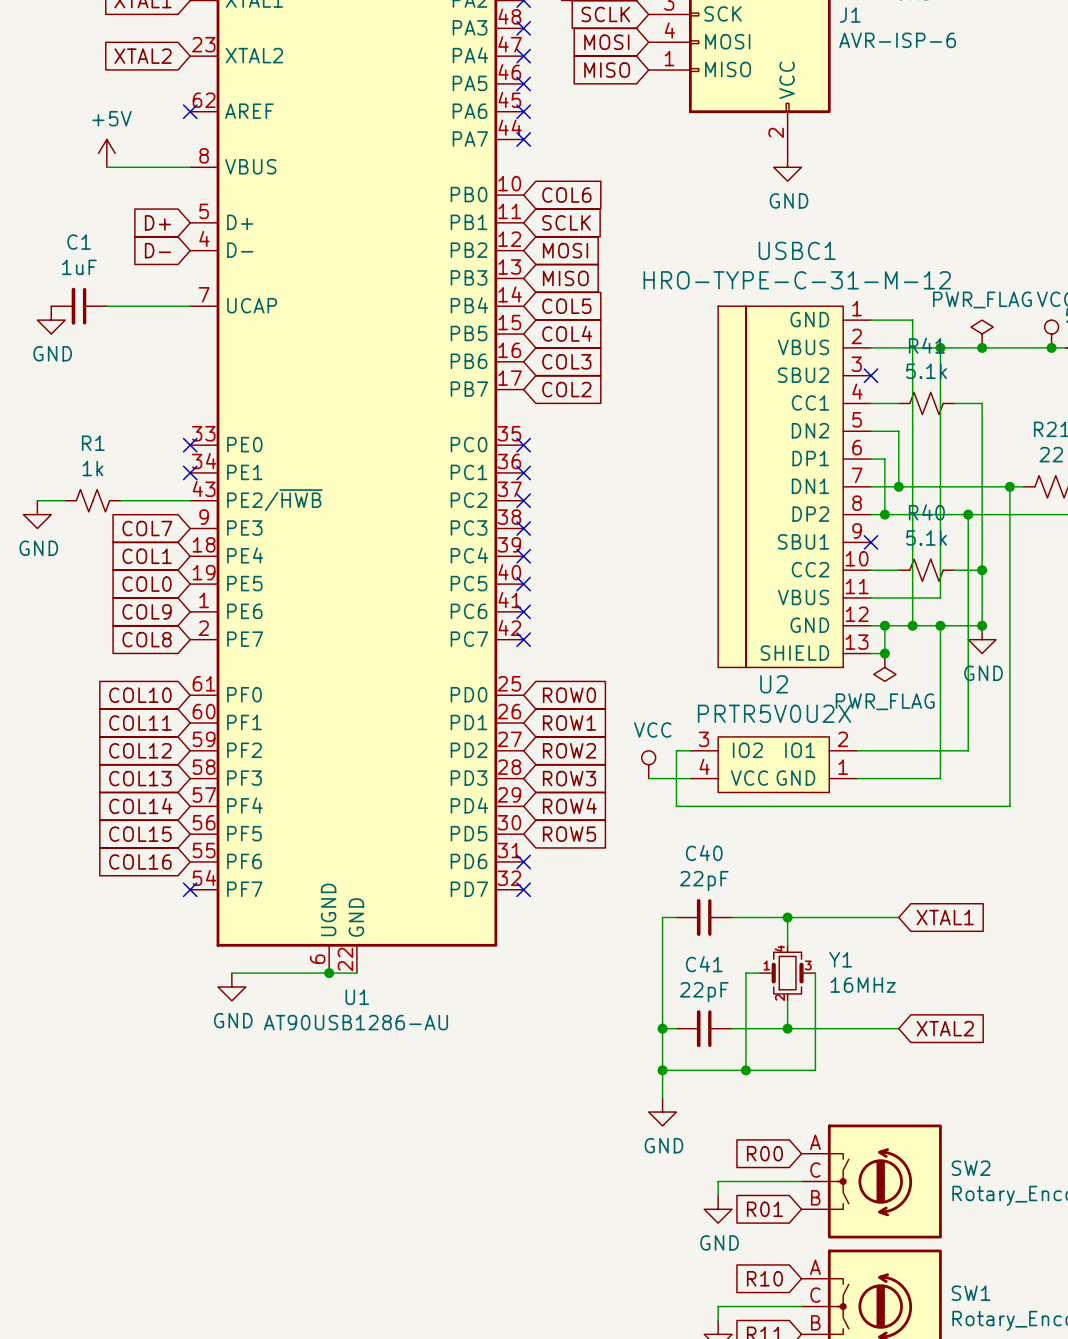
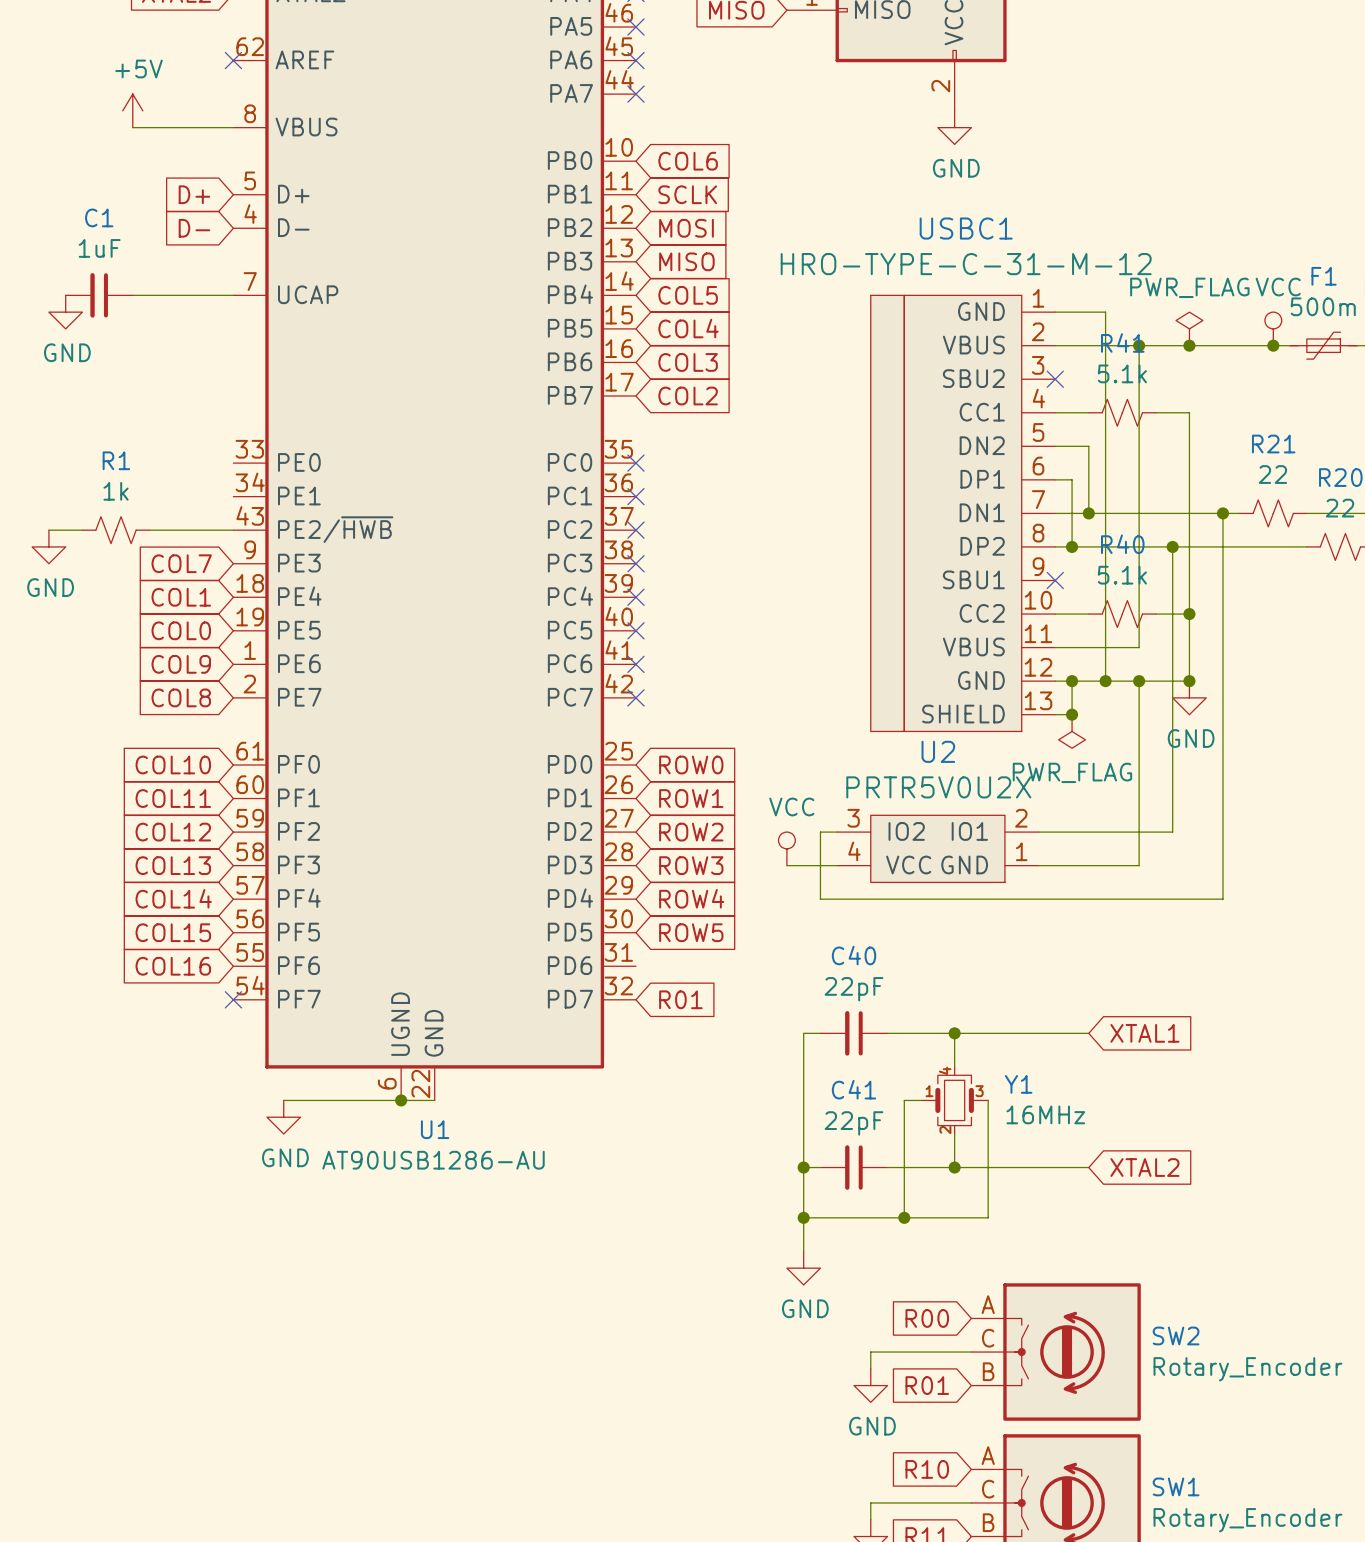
no-connect mark: (190, 445) -> none
no-connect mark: (190, 472) -> none
no-connect mark: (523, 861) -> none
no-connect mark: (523, 889) -> none
global label: none -> R01 (680, 999)

